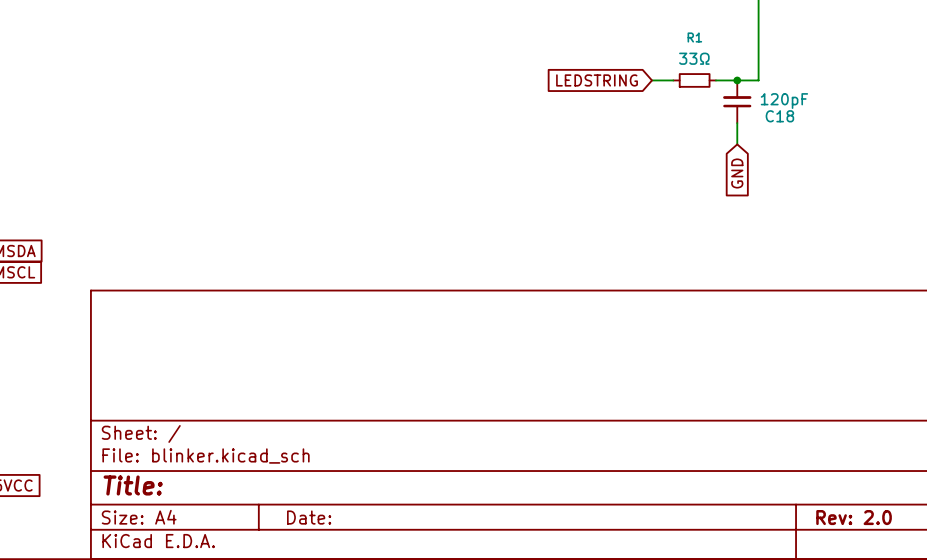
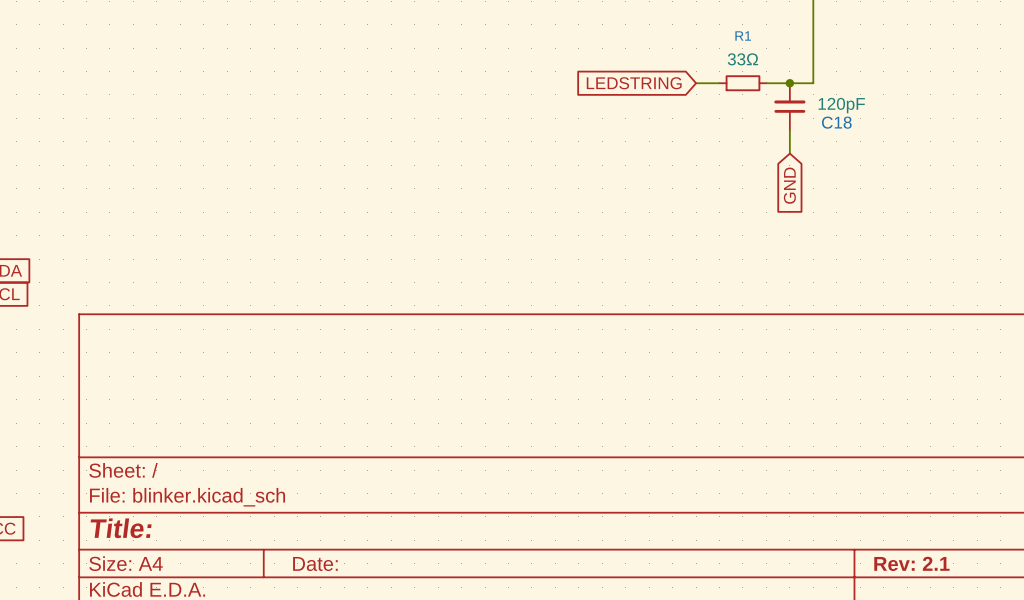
title block: Rev: 2.0 (854, 517) -> Rev: 2.1 (911, 563)

